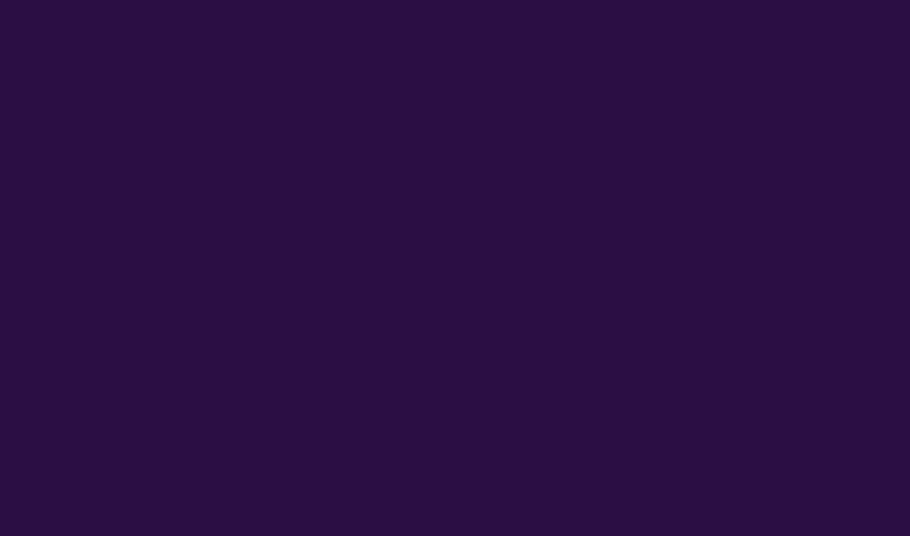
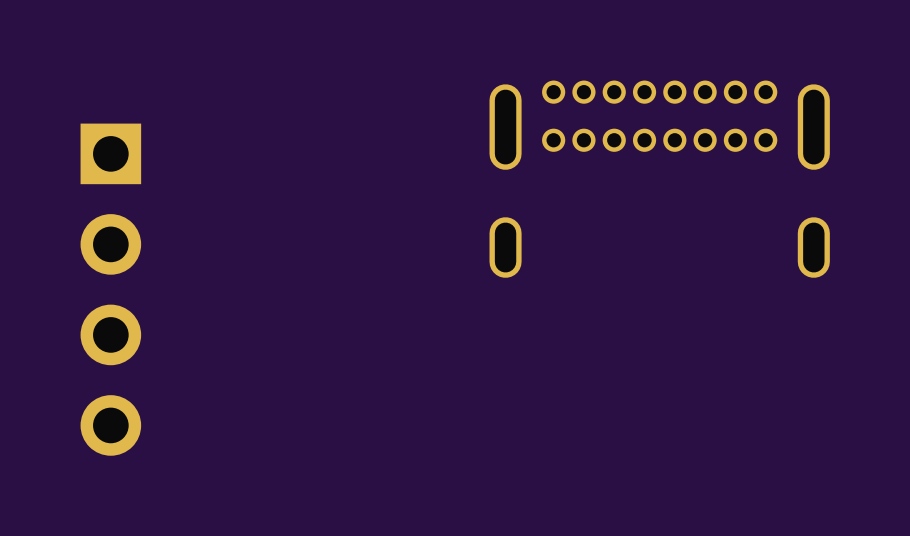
part: none -> (659, 179)
part: none -> (110, 289)

